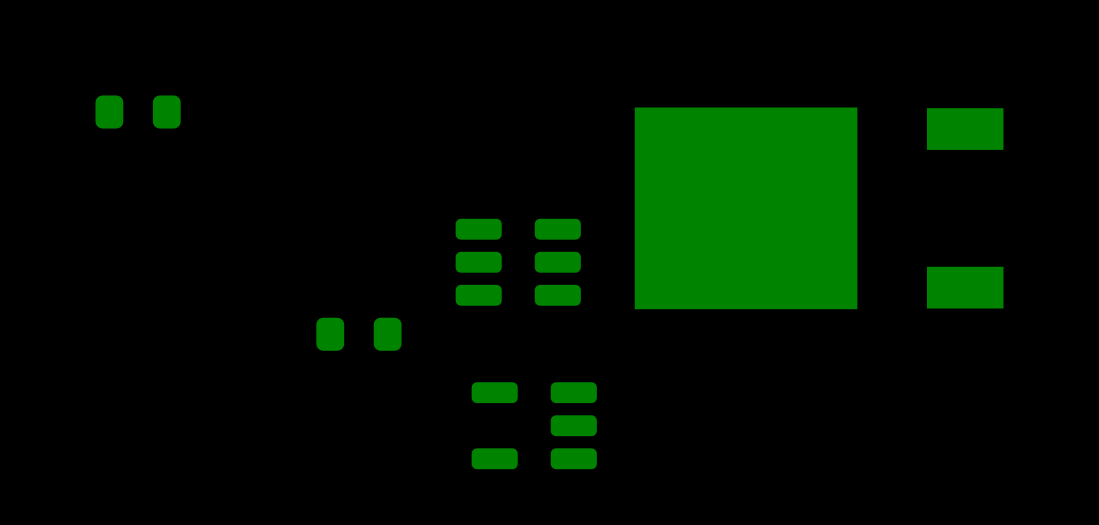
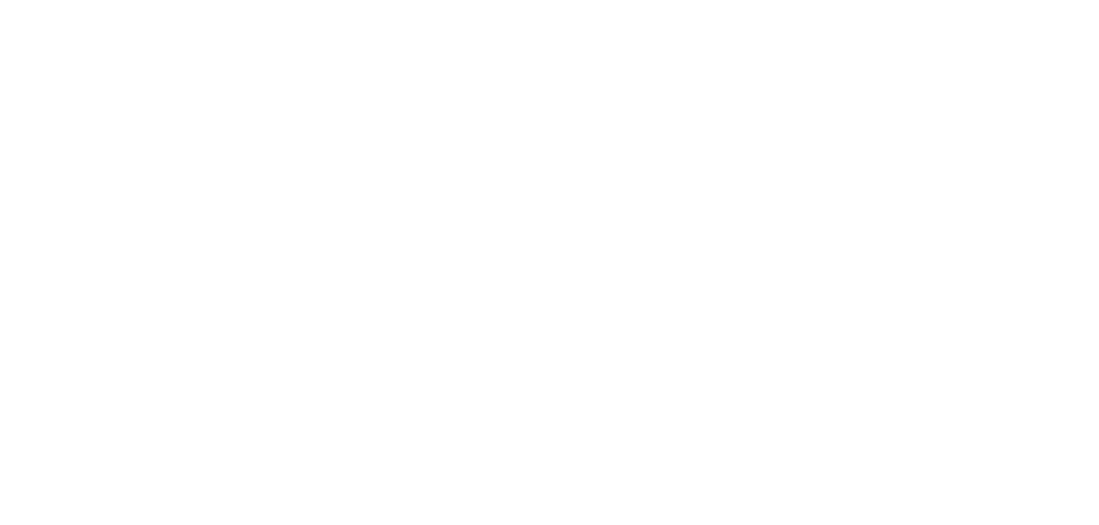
part: (138, 112) -> none
part: (819, 208) -> none
part: (518, 262) -> none
part: (358, 334) -> none
part: (534, 425) -> none

